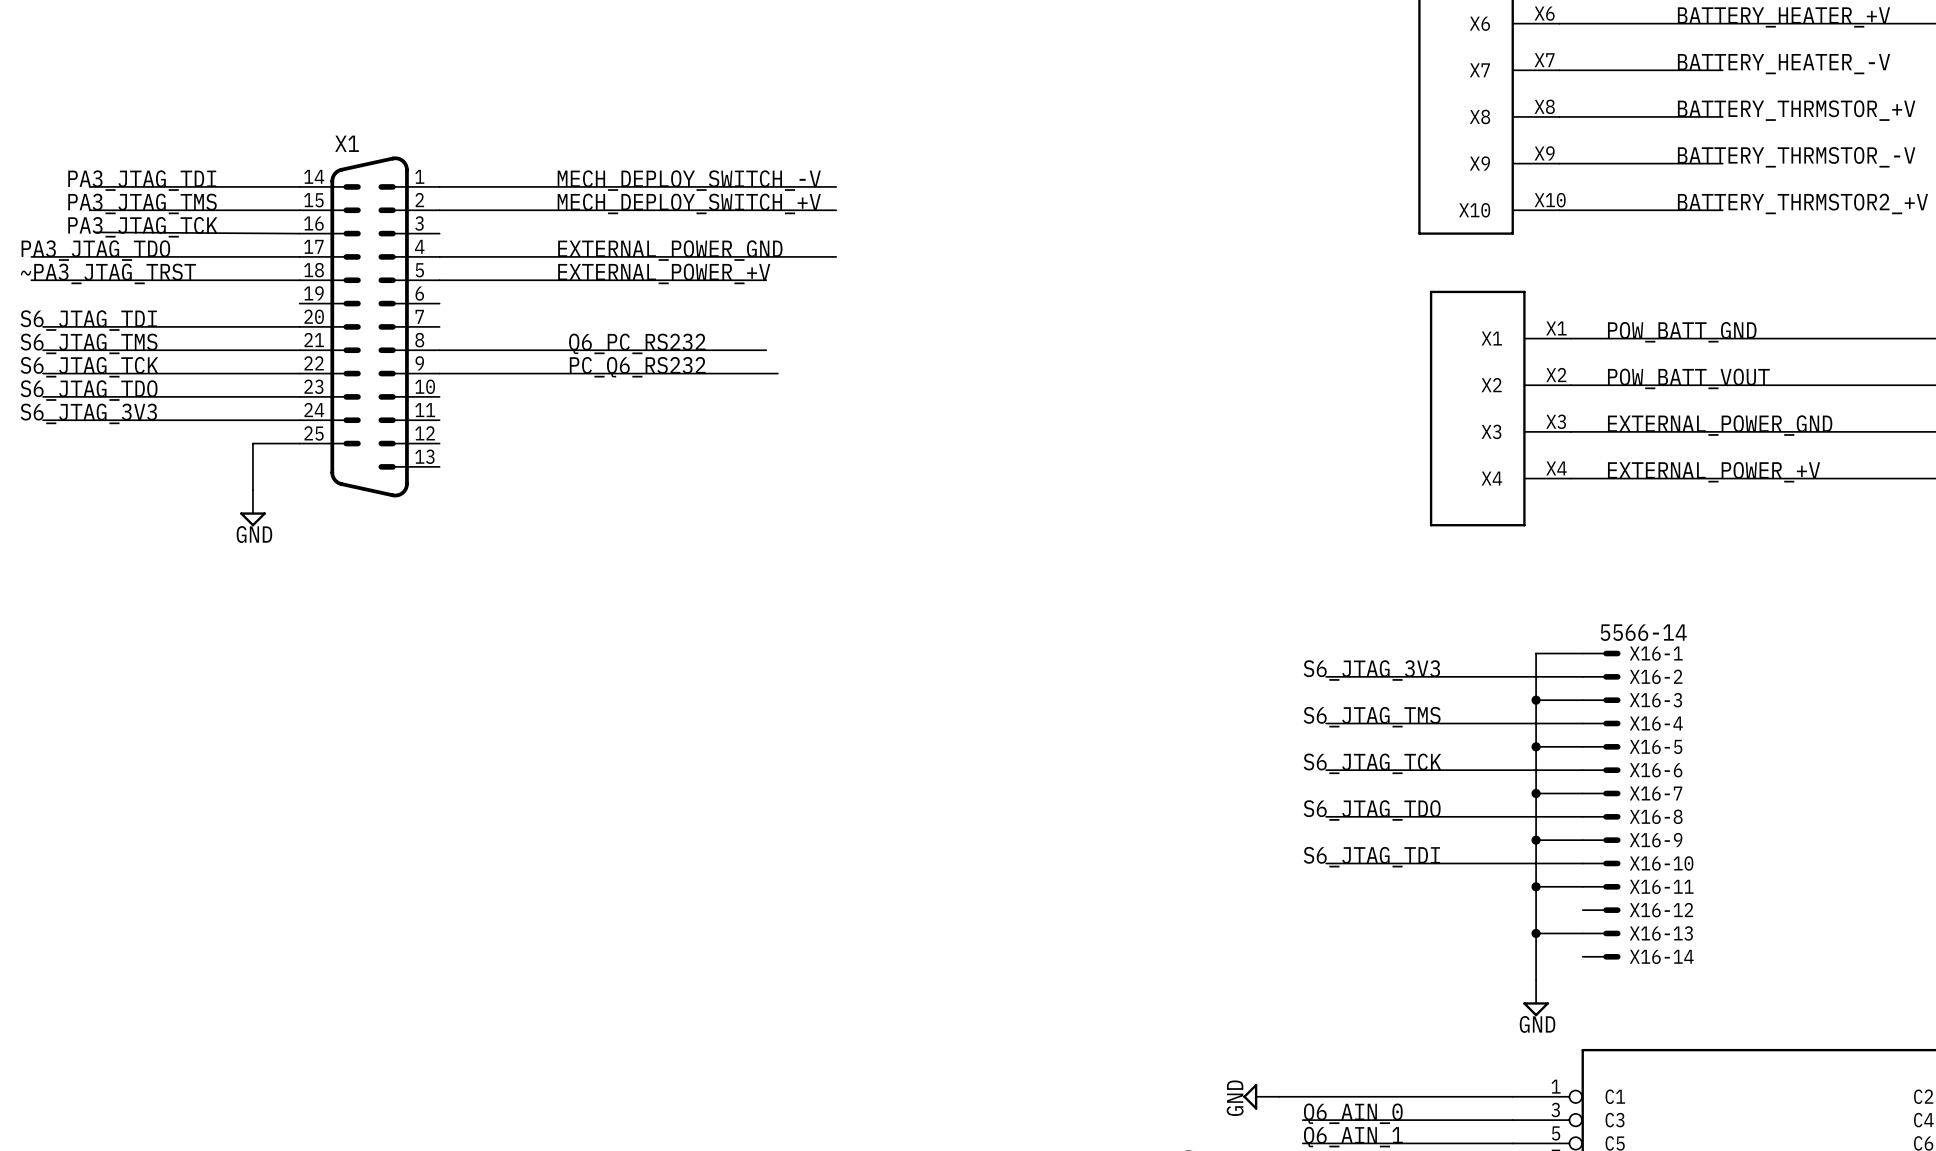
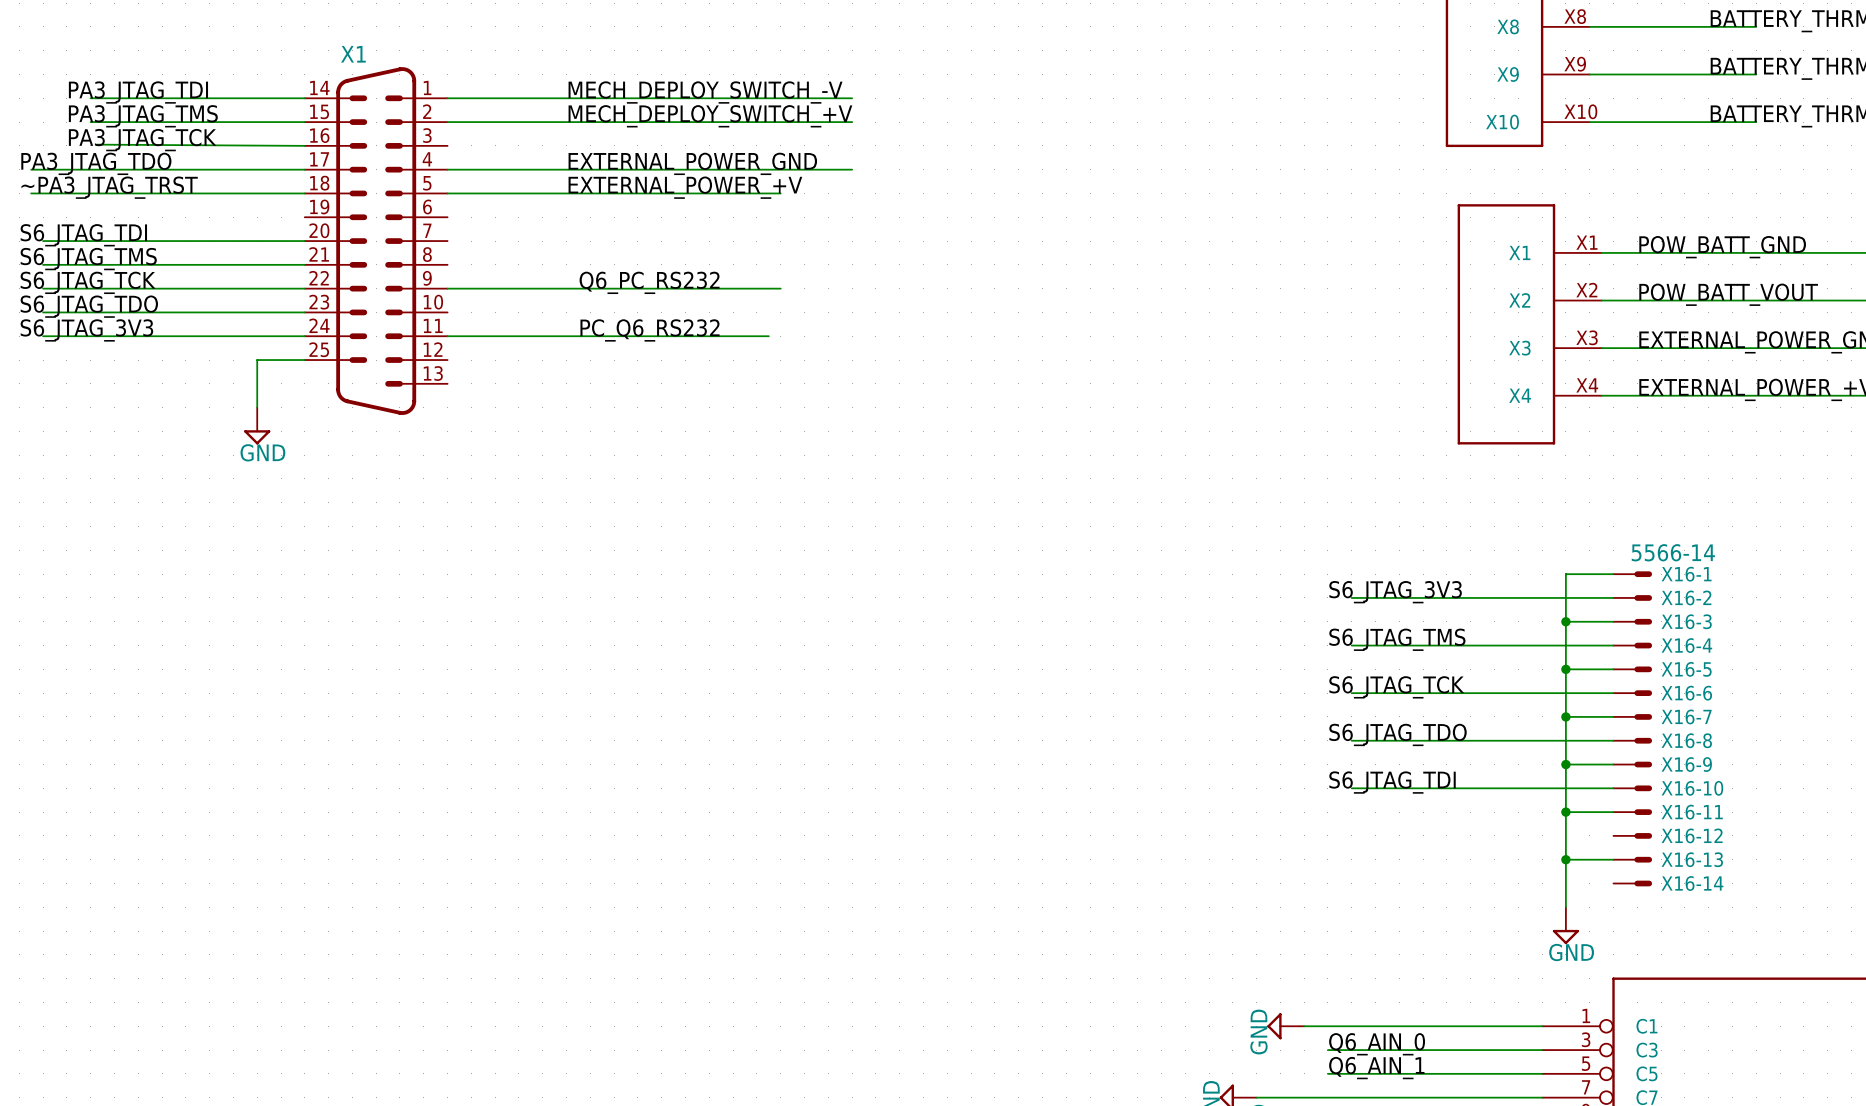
label: Q6_PC_RS232 (637, 343) -> none
wire: (439, 350) (766, 350) -> none
label: PC_Q6_RS232 (637, 367) -> Q6_PC_RS232 (649, 282)
wire: (766, 373) (777, 373) -> none
label: none -> PC_Q6_RS232 (650, 330)
wire: none -> (447, 336) (768, 336)

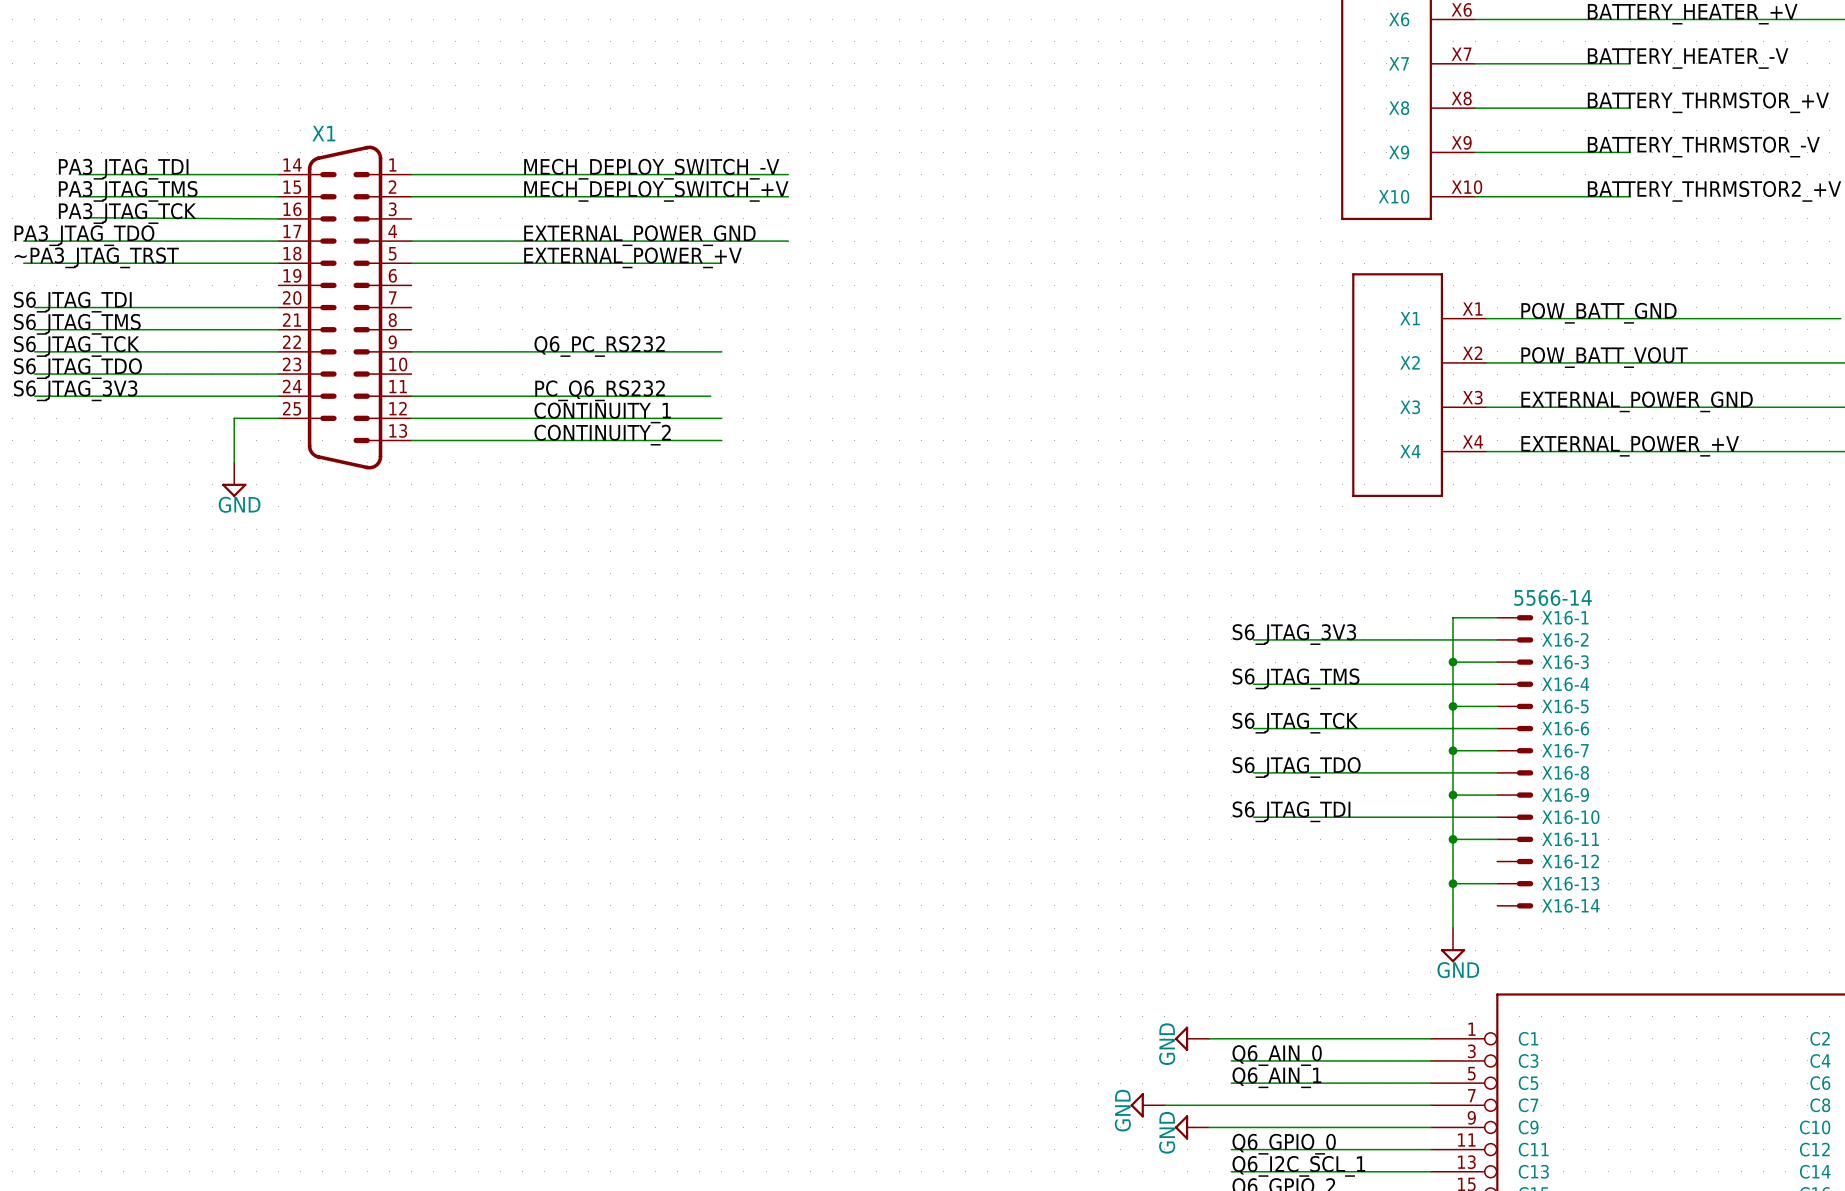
label: none -> CONTINUITY_1 (602, 412)
wire: none -> (411, 418) (721, 418)
label: none -> CONTINUITY_2 (602, 435)
wire: none -> (411, 440) (721, 440)

